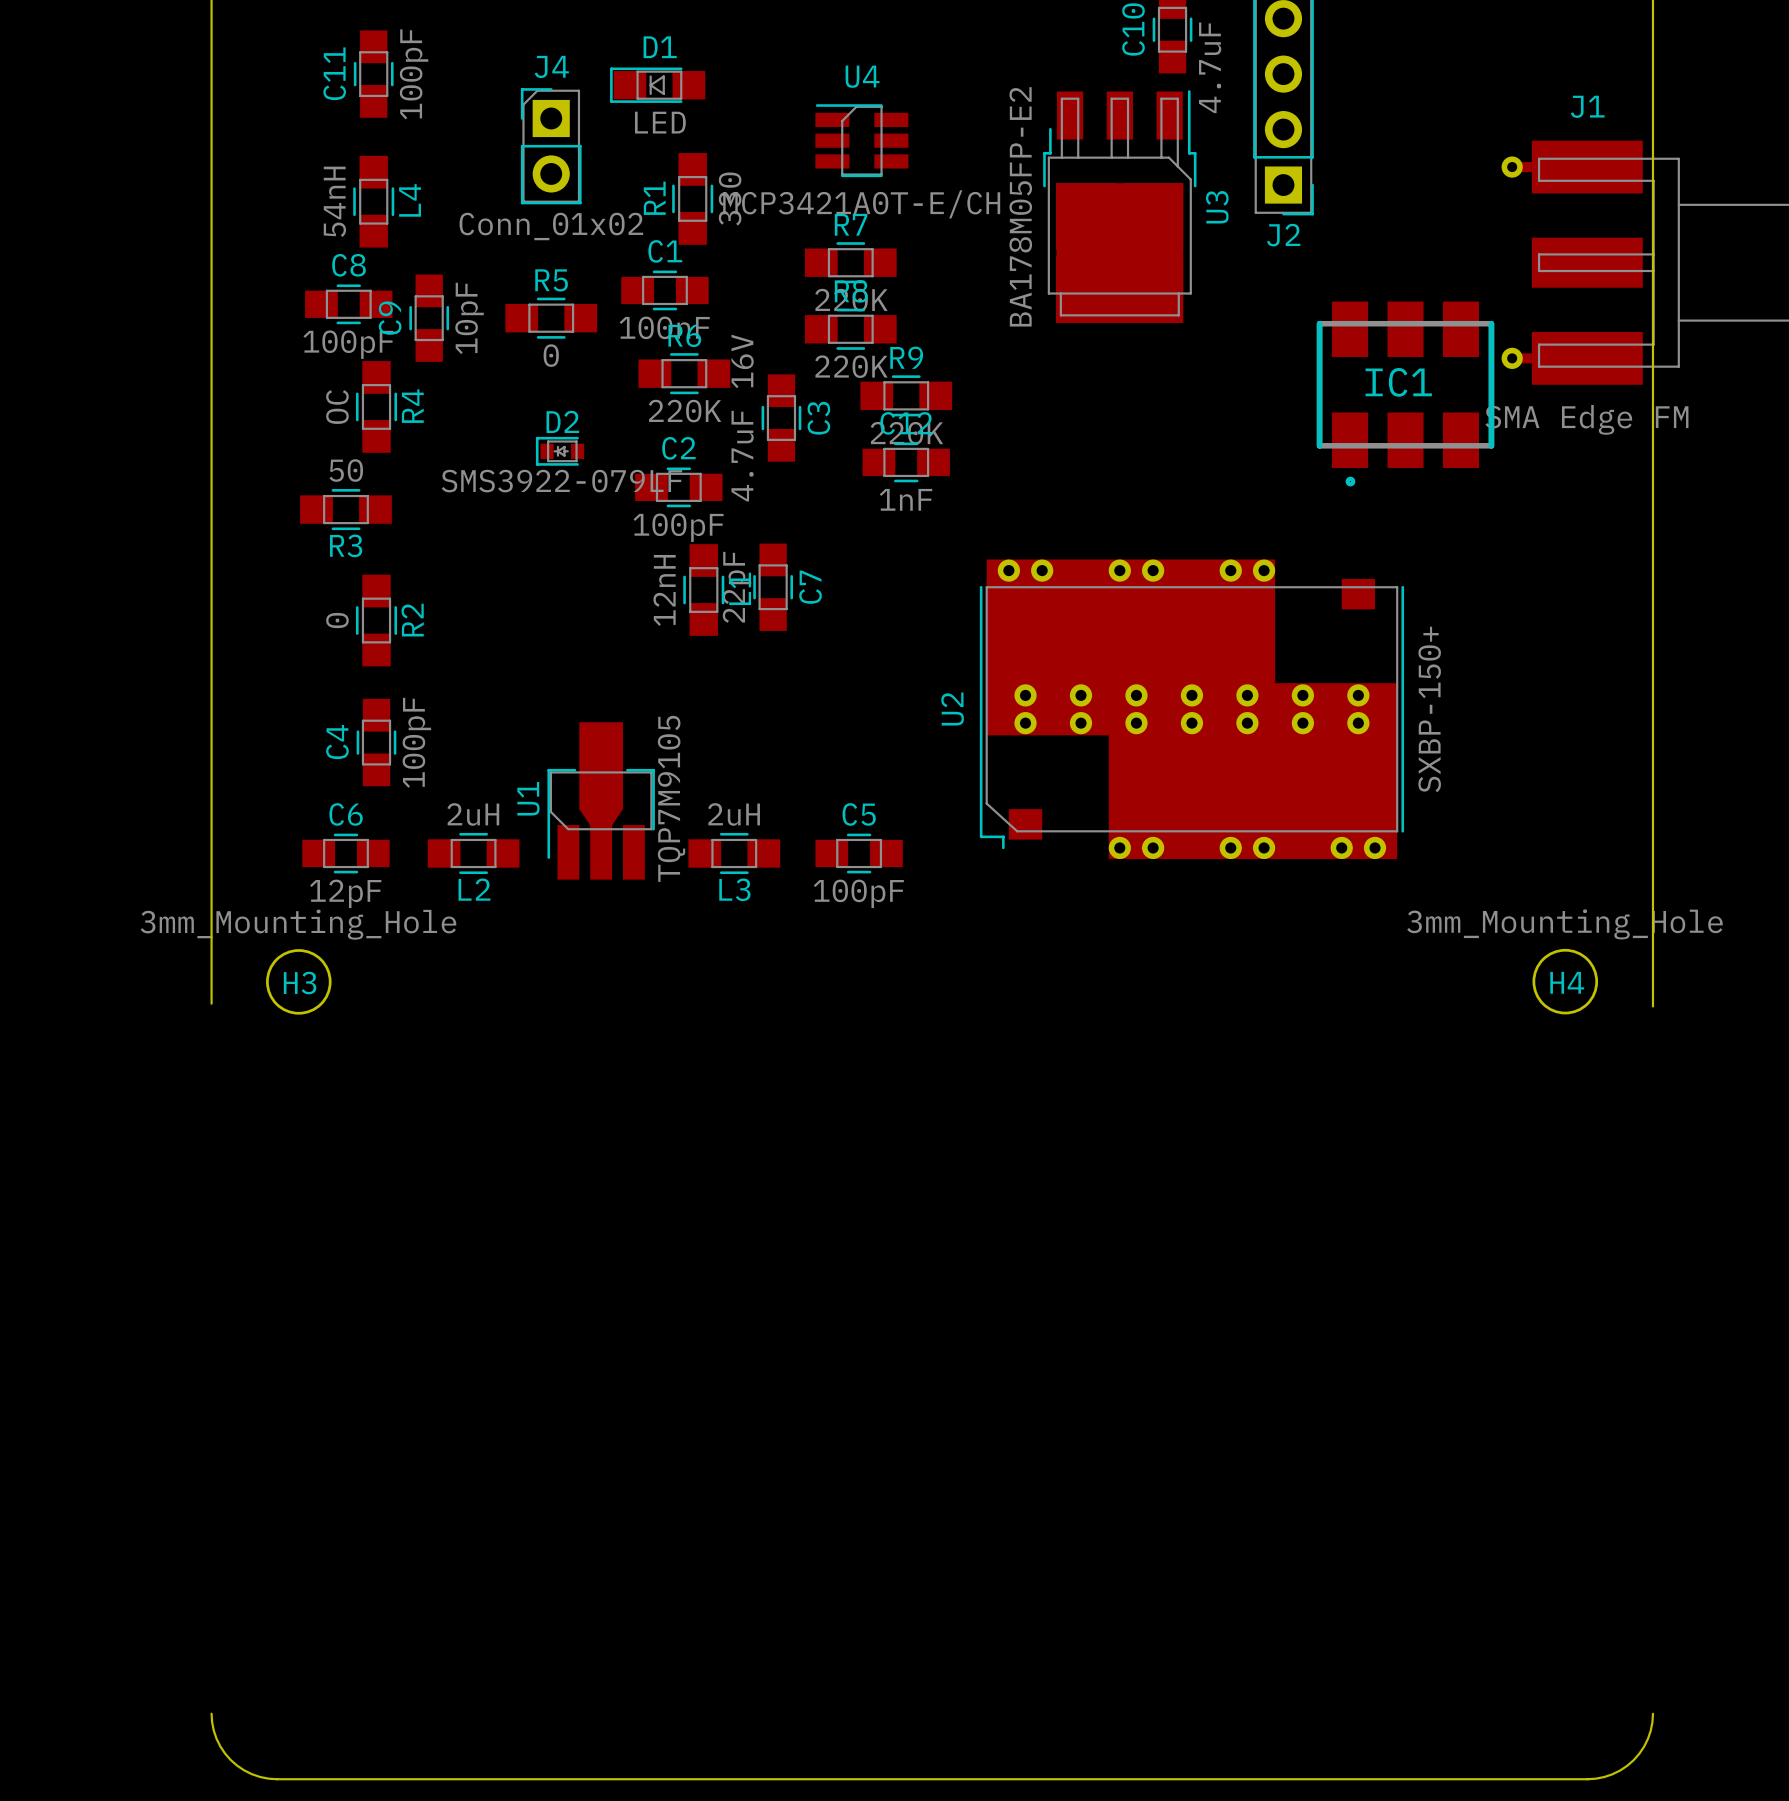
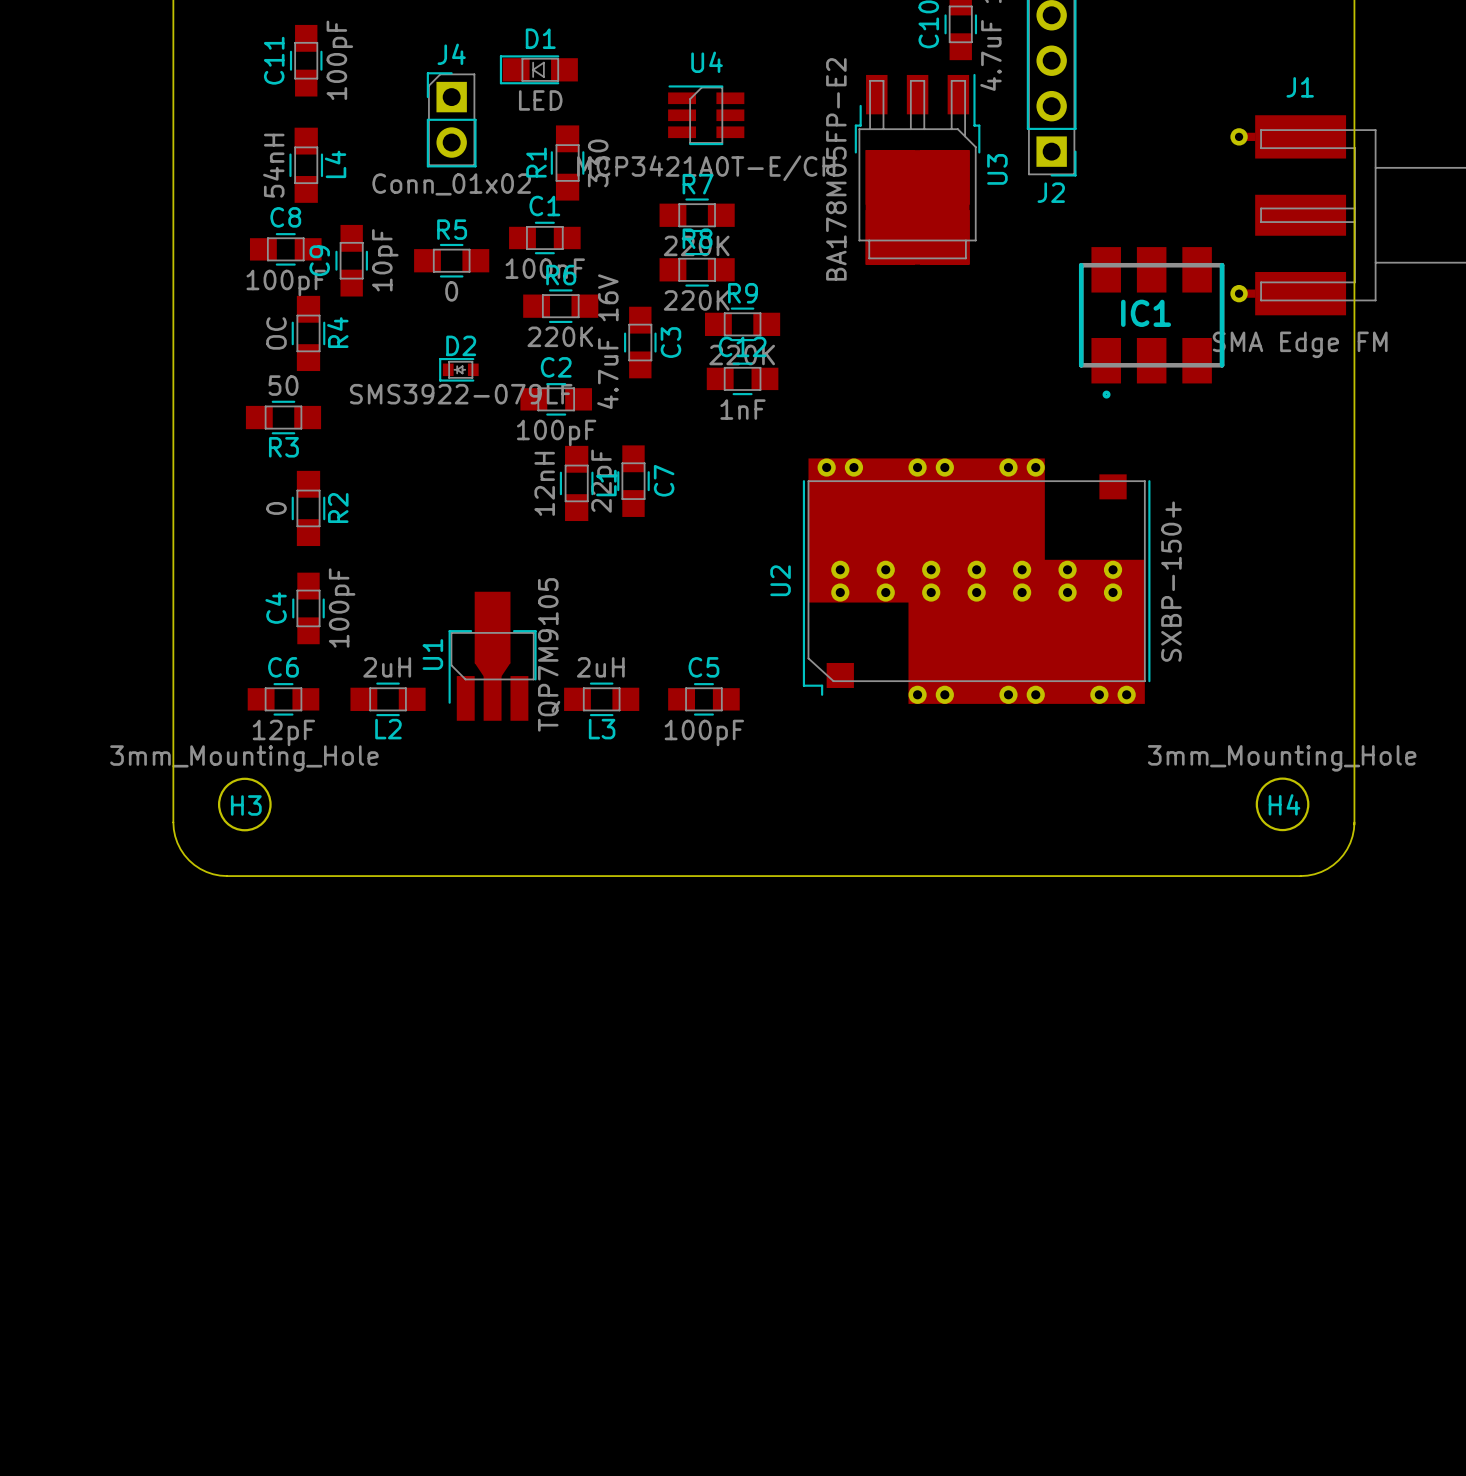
board edge: none -> (173, 822) (177, 842) (189, 860) (206, 871) (227, 876) (1300, 876) (1321, 871) (1338, 860) (1350, 842) (1354, 822)
board edge: (211, 1713) (216, 1738) (230, 1760) (252, 1774) (277, 1779) (1587, 1779) (1612, 1774) (1633, 1760) (1647, 1738) (1652, 1713) -> none

